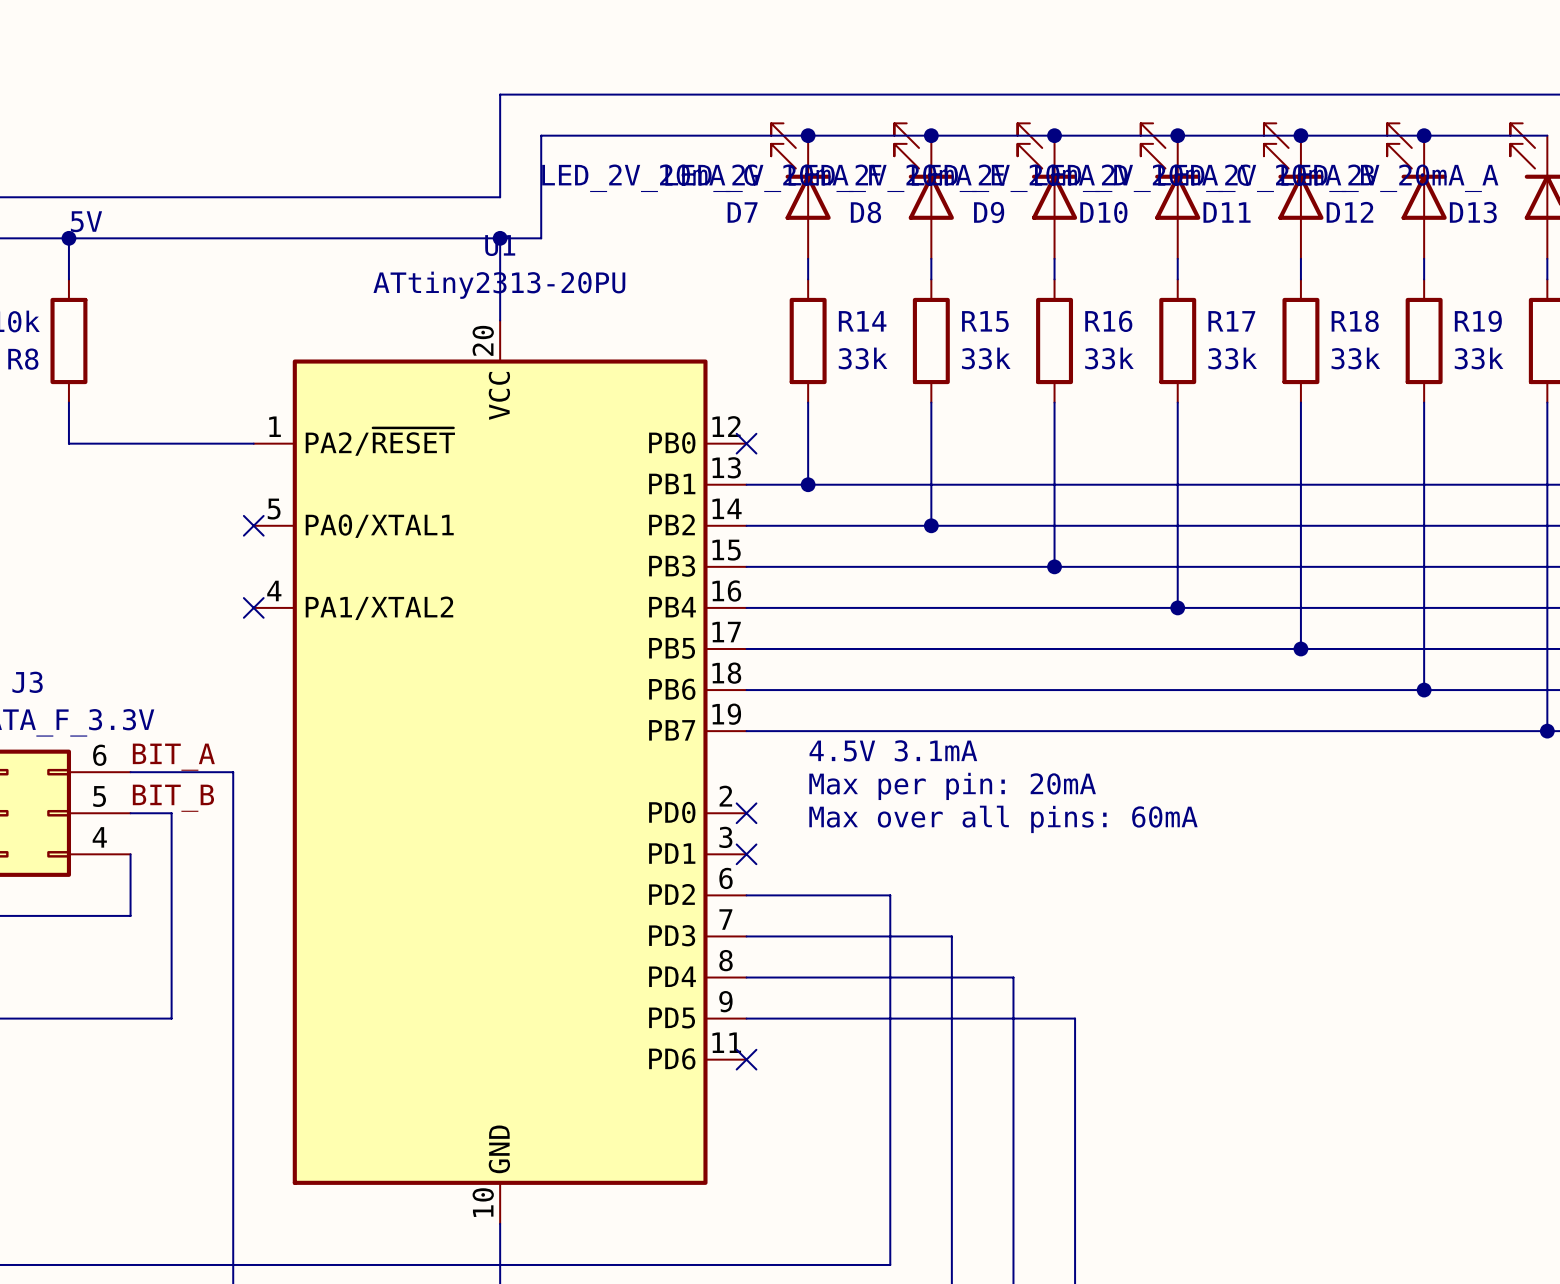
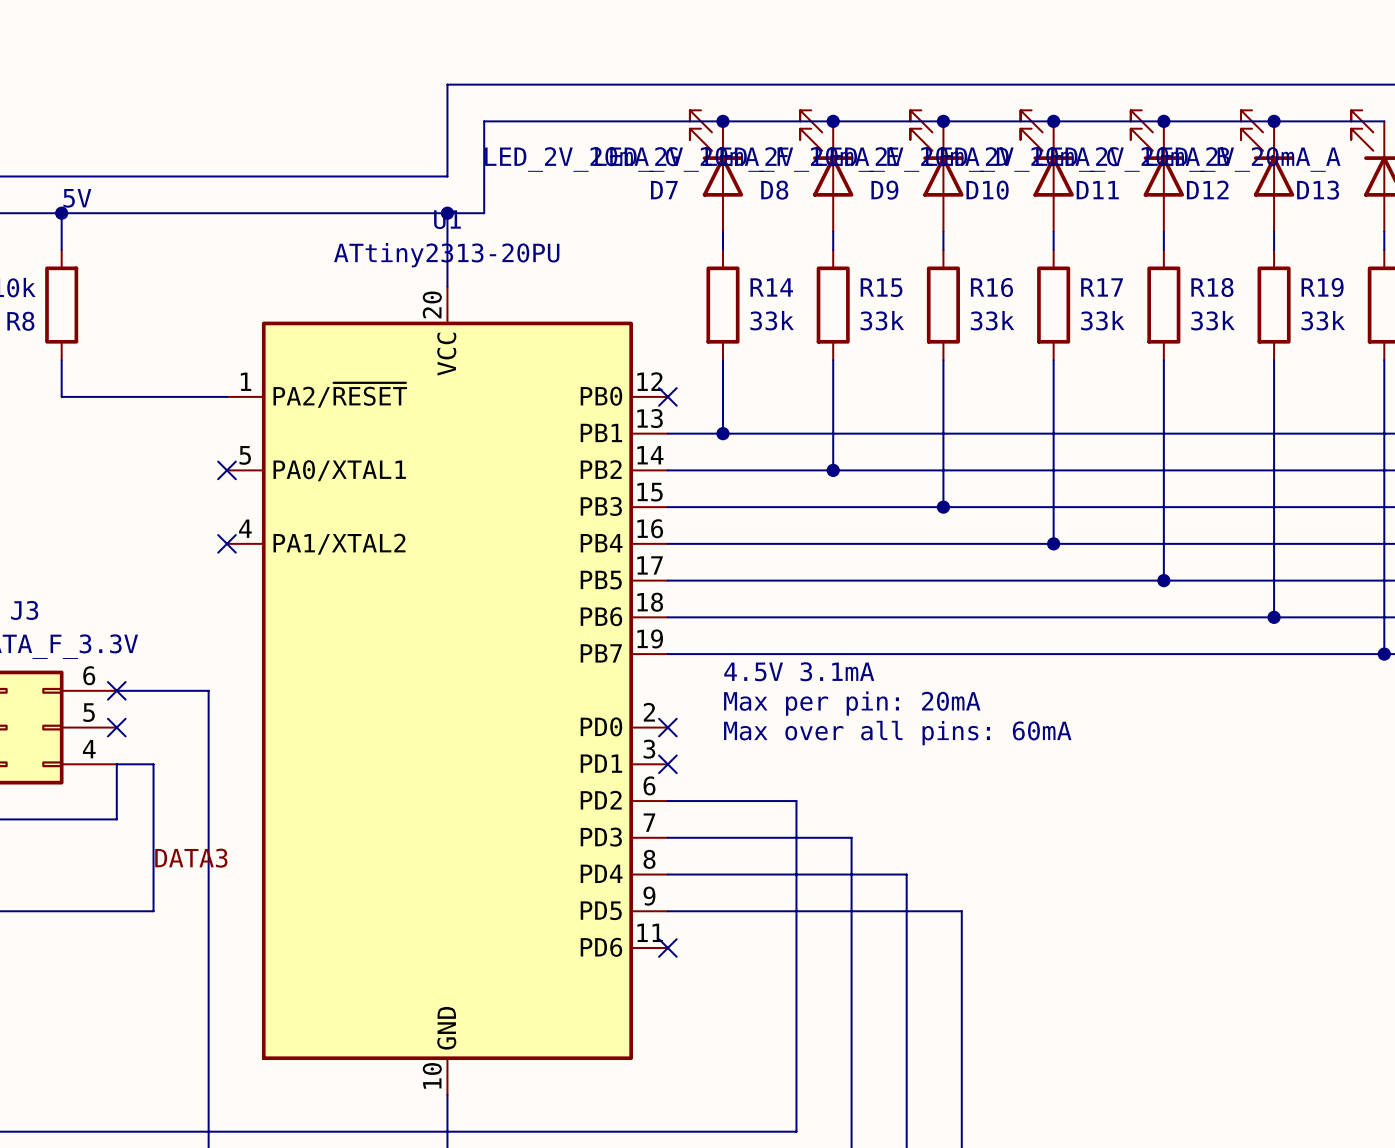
label: BIT_A (173, 757) -> none
no-connect mark: none -> (116, 690)
label: BIT_B (173, 798) -> none
wire: (130, 813) (171, 813) (171, 854) -> (116, 764) (153, 764)
no-connect mark: none -> (116, 727)
label: none -> DATA3 (191, 858)

